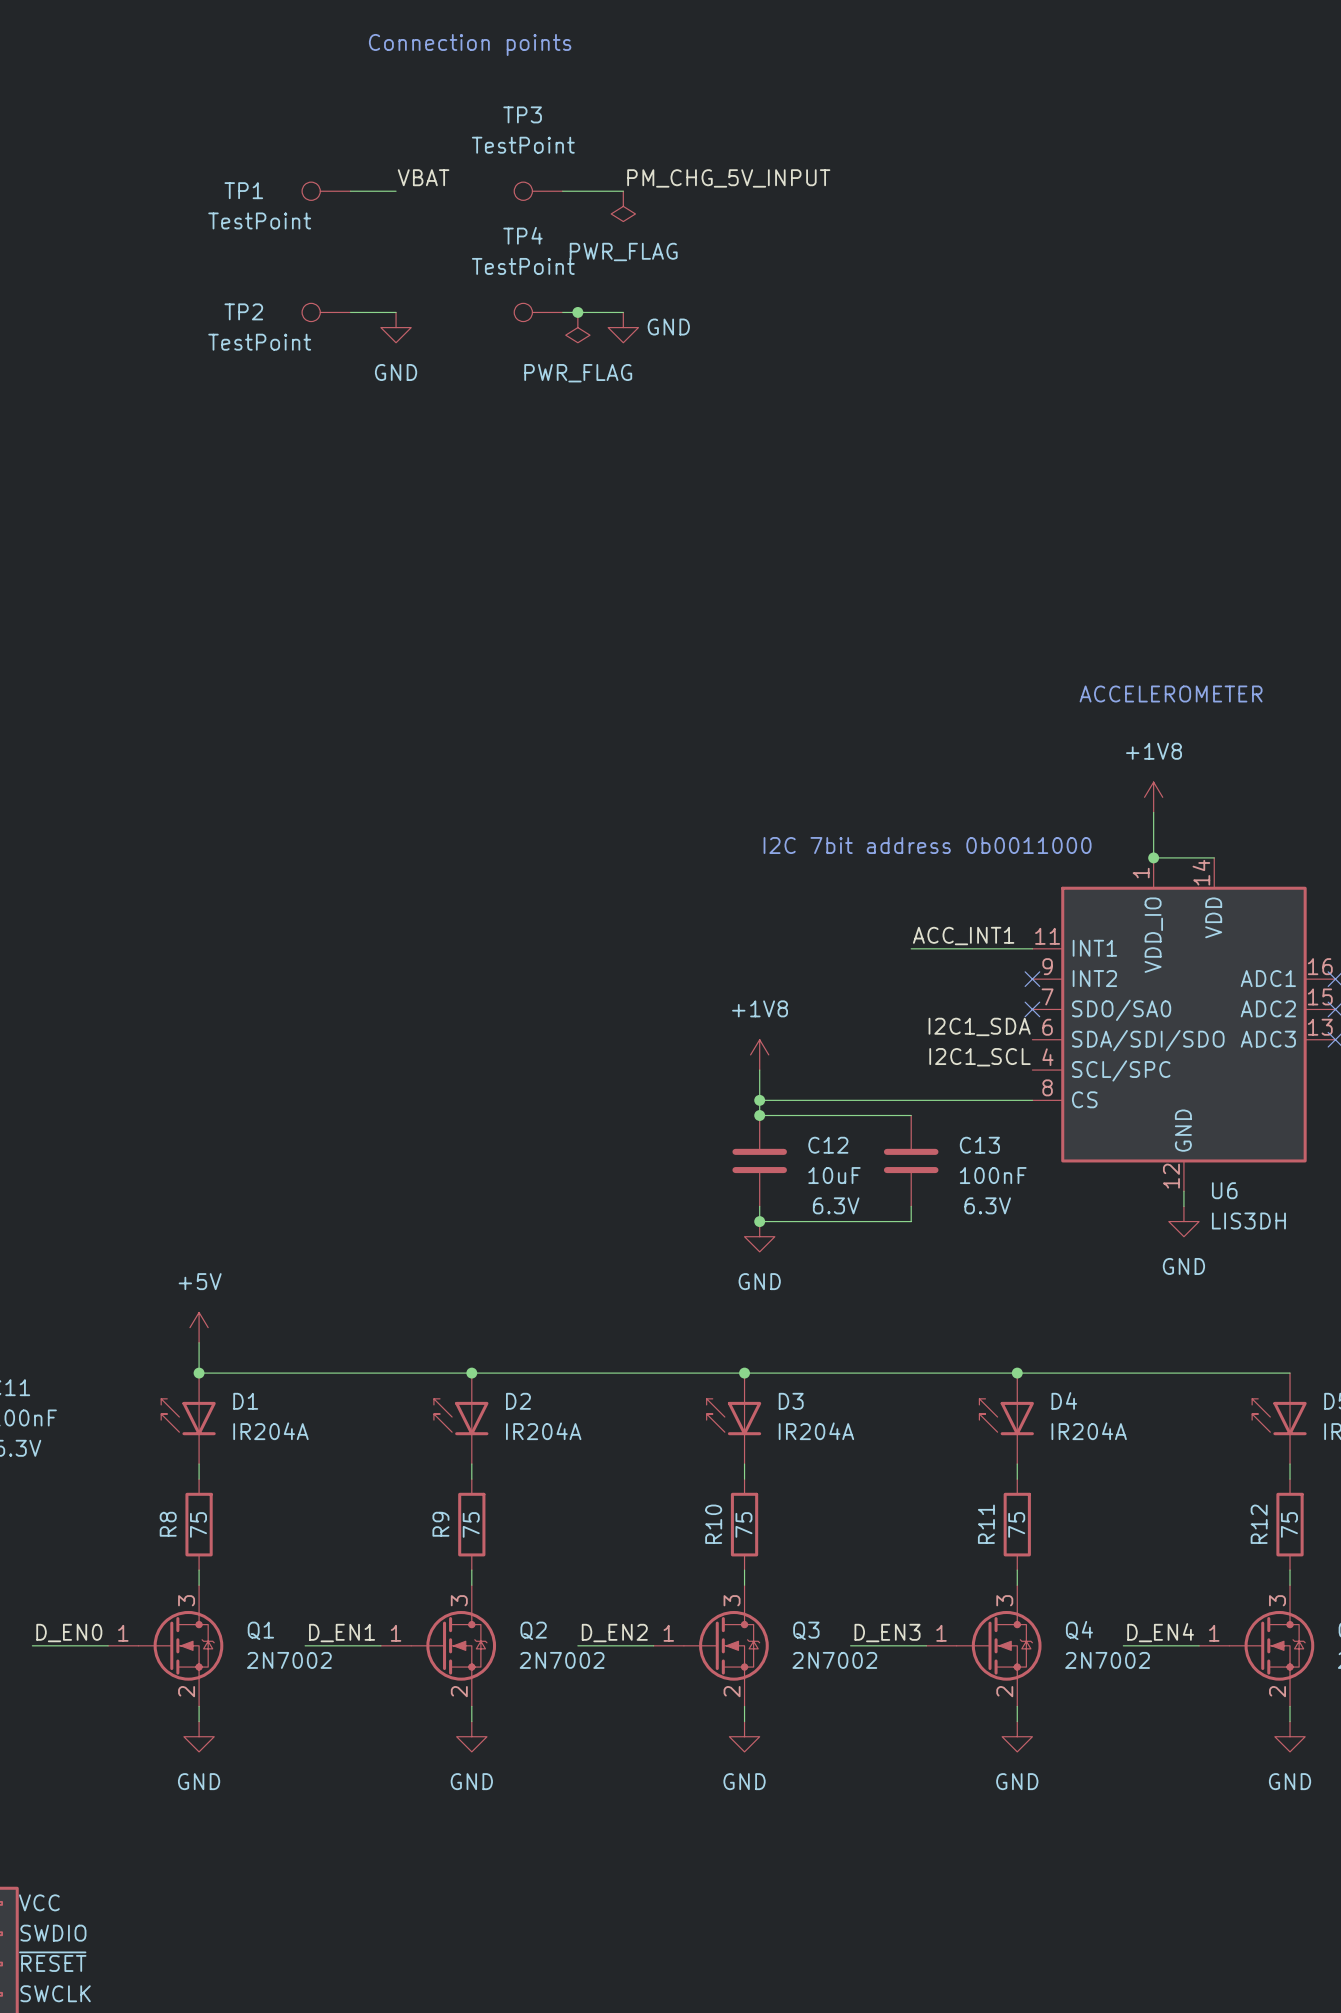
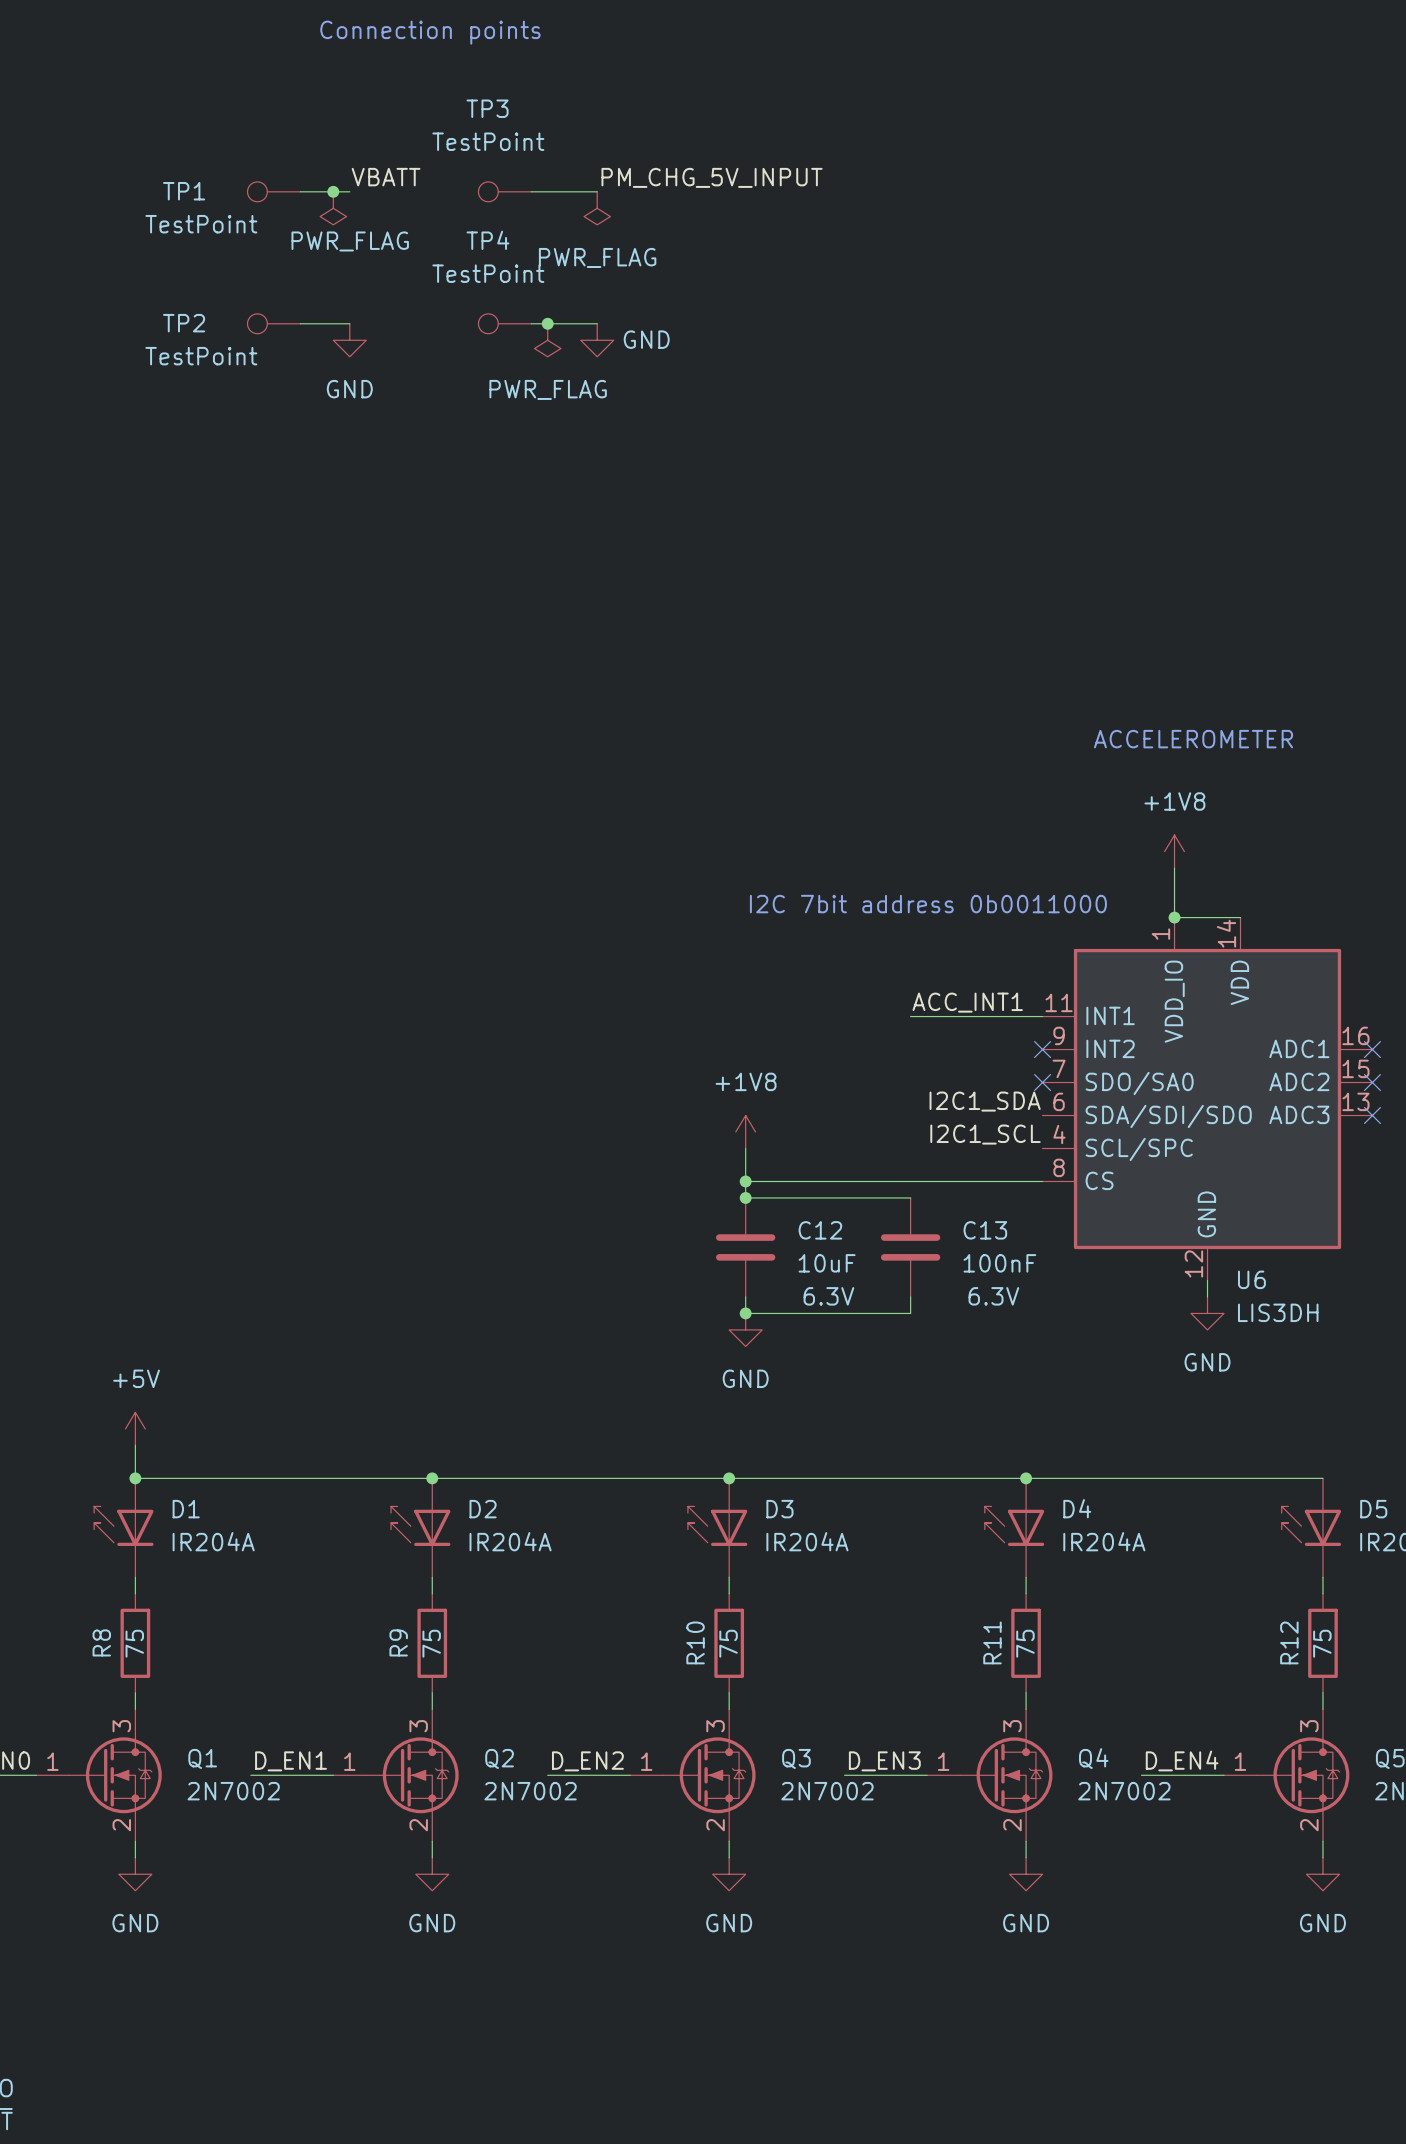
label: VBAT (423, 177) -> VBATT (386, 177)
junction: none -> (333, 191)
power symbol: none -> PWR_FLAG (333, 208)

